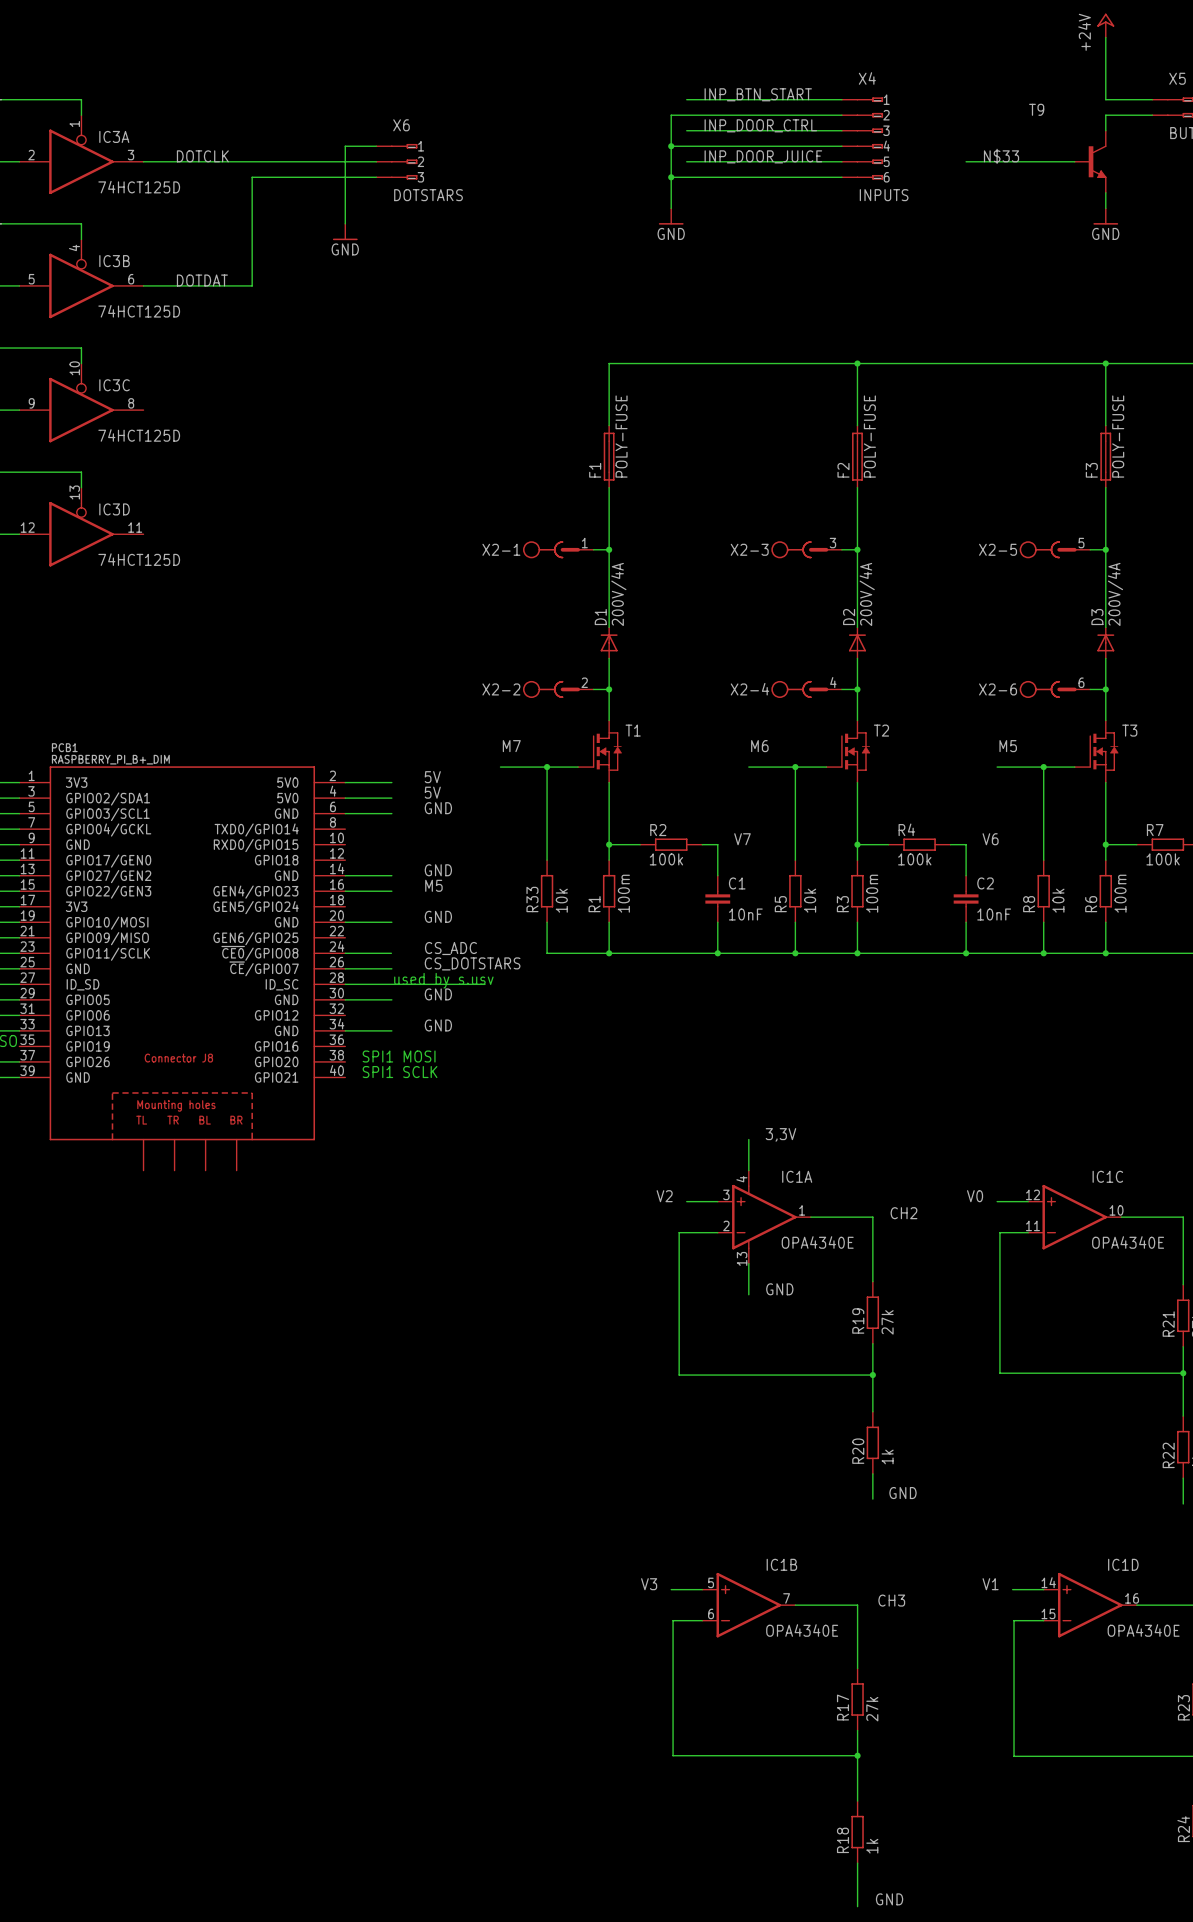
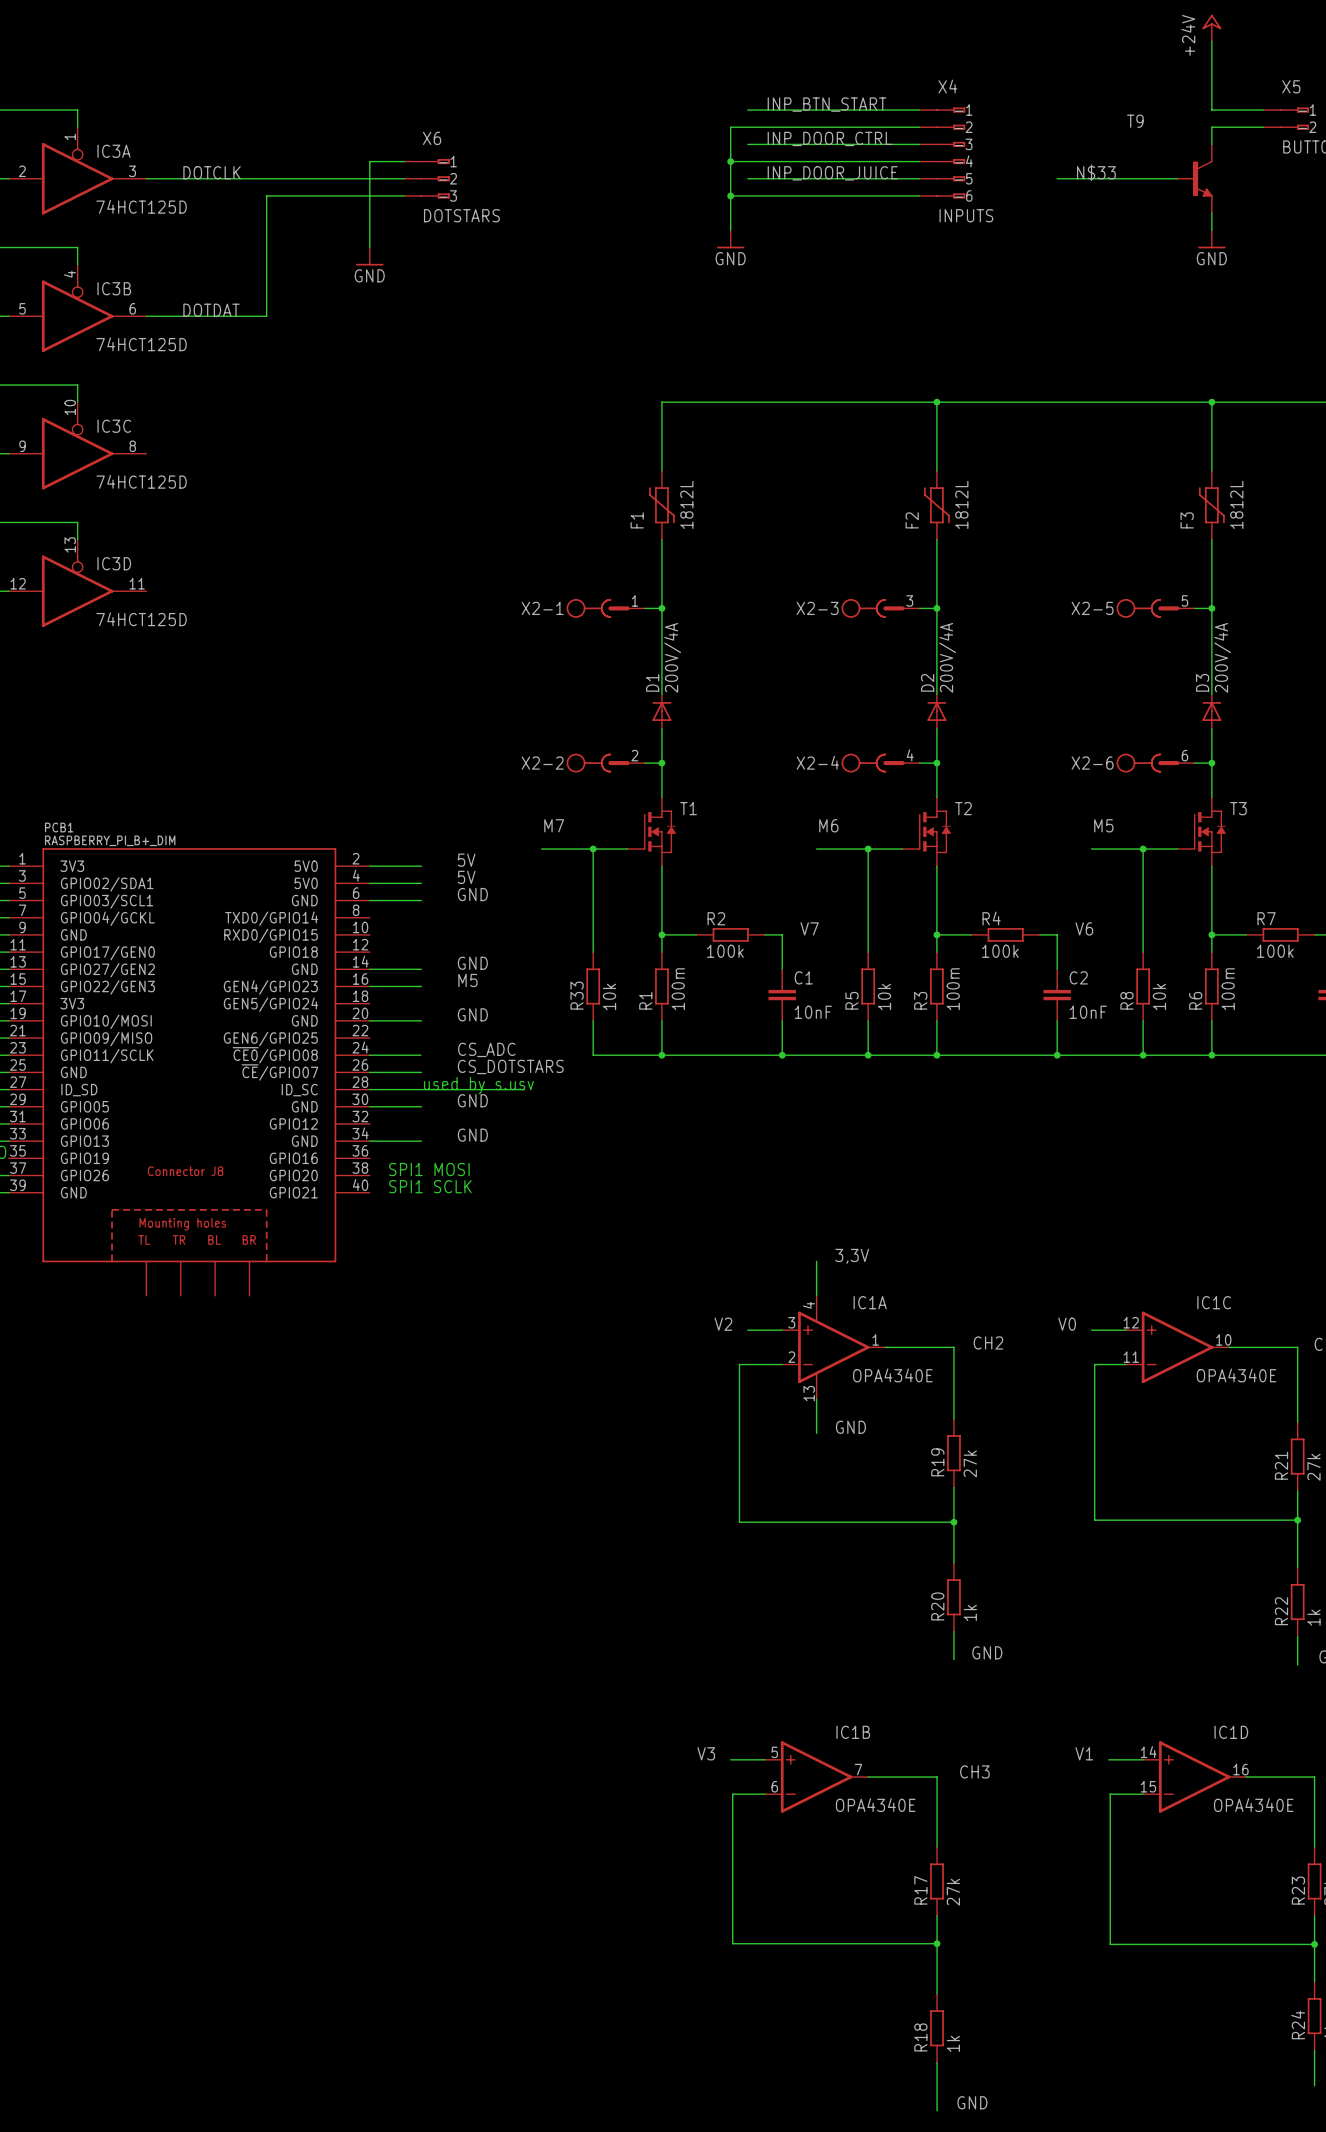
F1 symbol: [603, 425, 615, 488] -> [649, 470, 675, 540]
F2 symbol: [852, 425, 863, 488] -> [924, 470, 950, 540]
F3 symbol: [1100, 425, 1112, 488] -> [1198, 470, 1225, 540]
F1 value: POLY-FUSE (621, 436) -> 1812L (686, 504)
F2 value: POLY-FUSE (869, 436) -> 1812L (961, 504)
F3 value: POLY-FUSE (1118, 436) -> 1812L (1236, 504)

